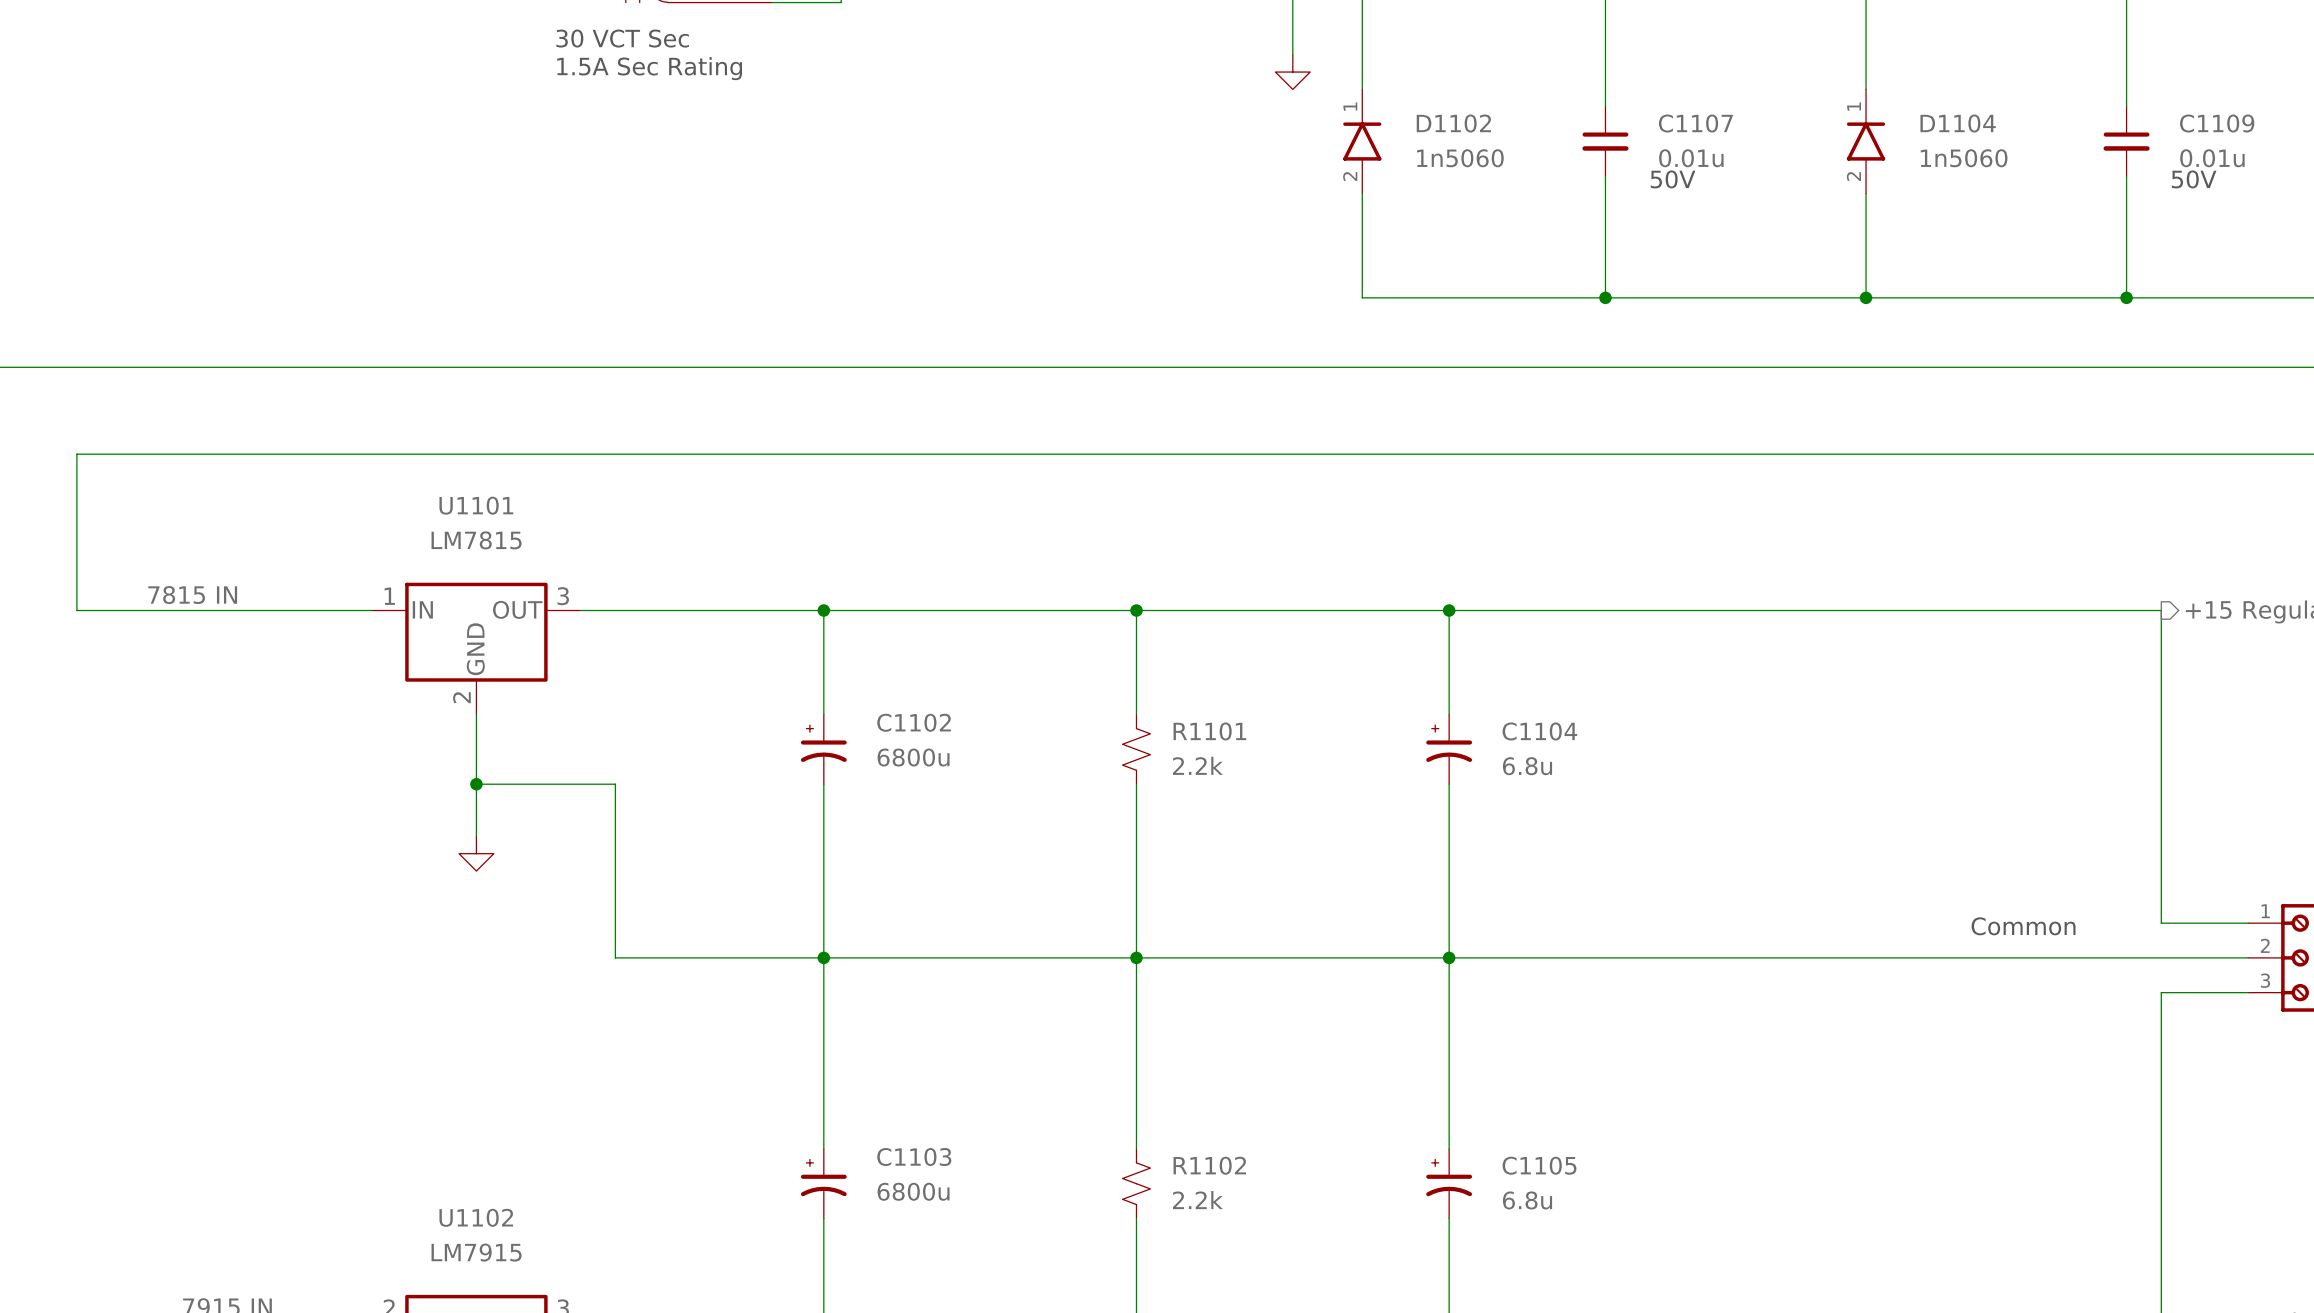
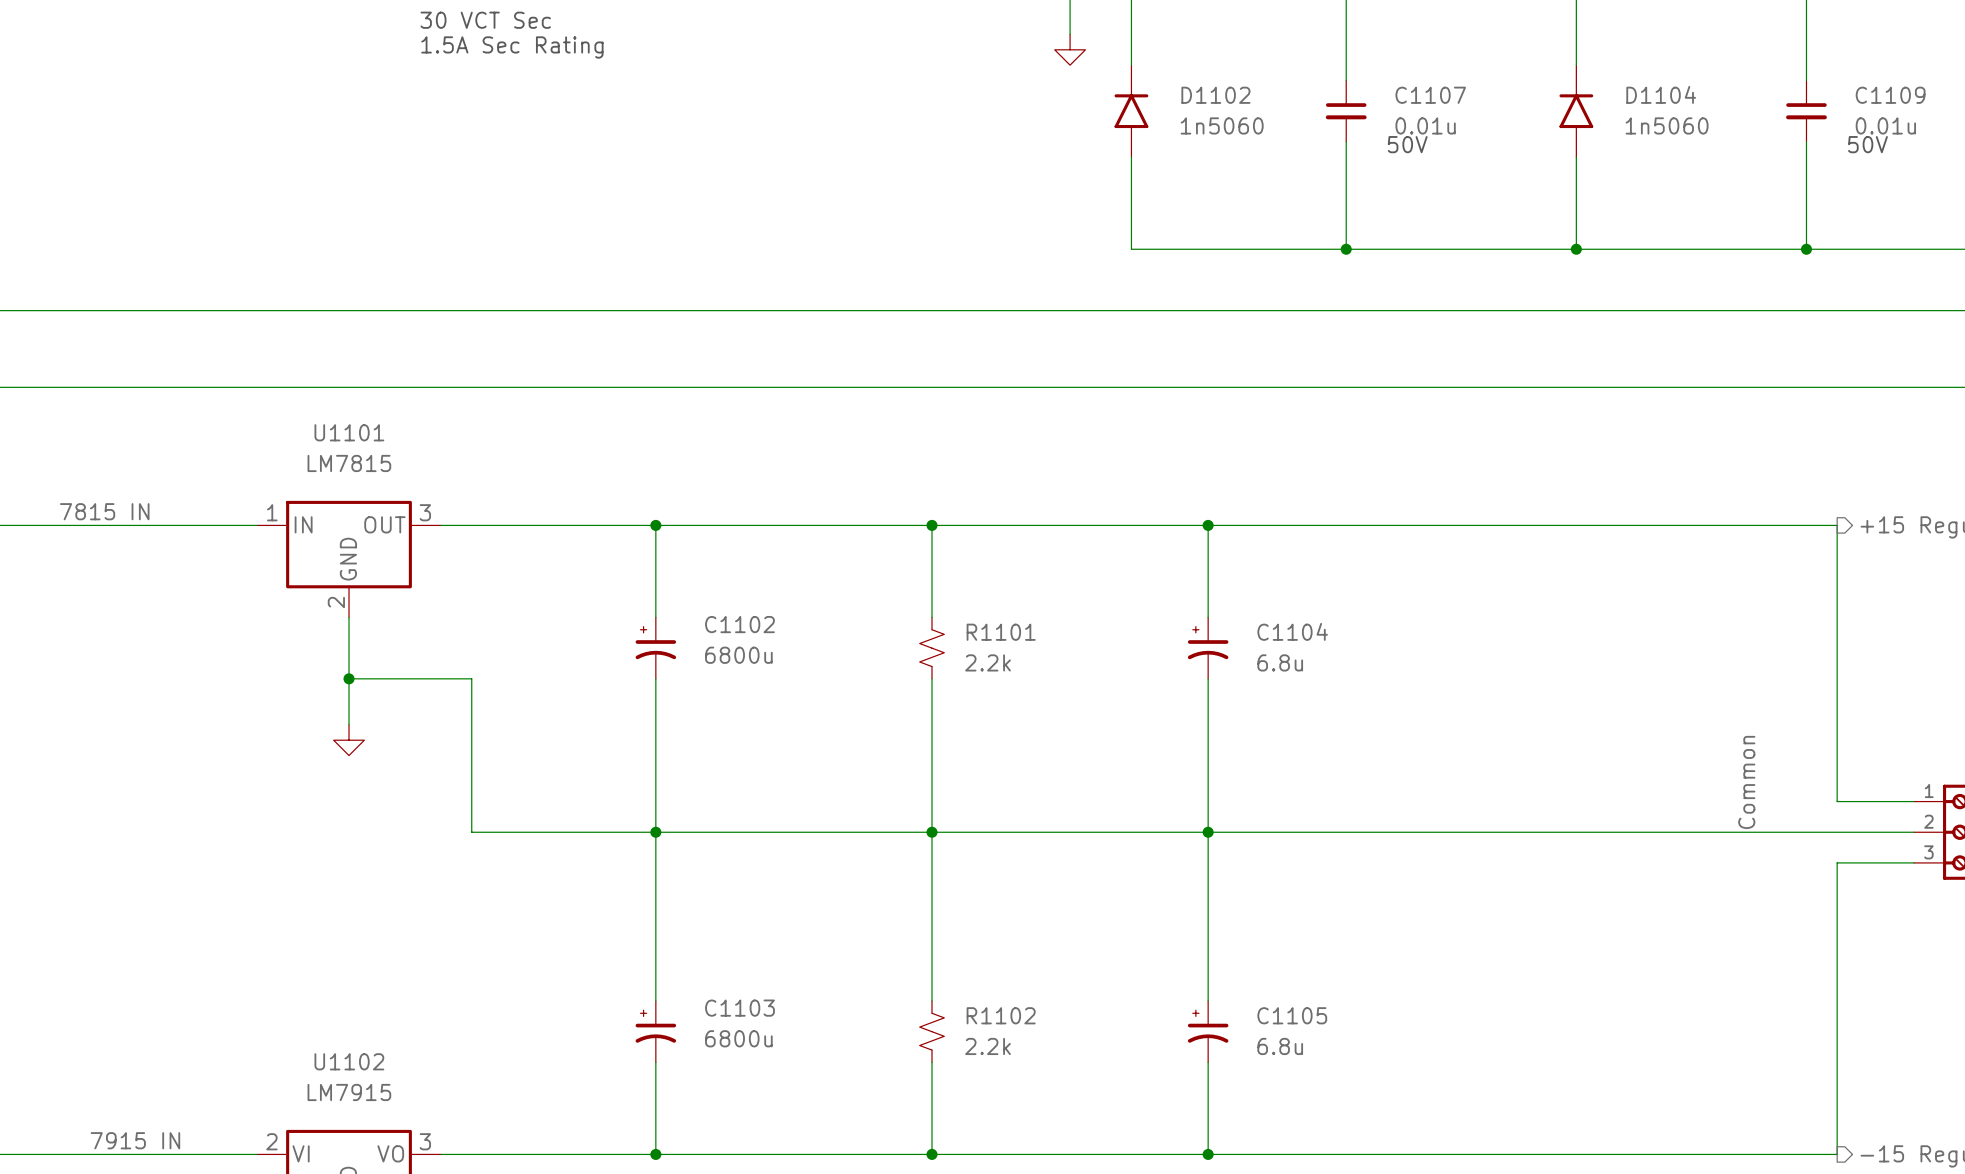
D1102 pin number: 1 (1350, 106) -> none
D1104 pin number: 1 (1854, 106) -> none
D1102 pin number: 2 (1350, 176) -> none
D1104 pin number: 2 (1853, 176) -> none
label: none -> Common (1746, 782)
text: Common (2023, 926) -> none

